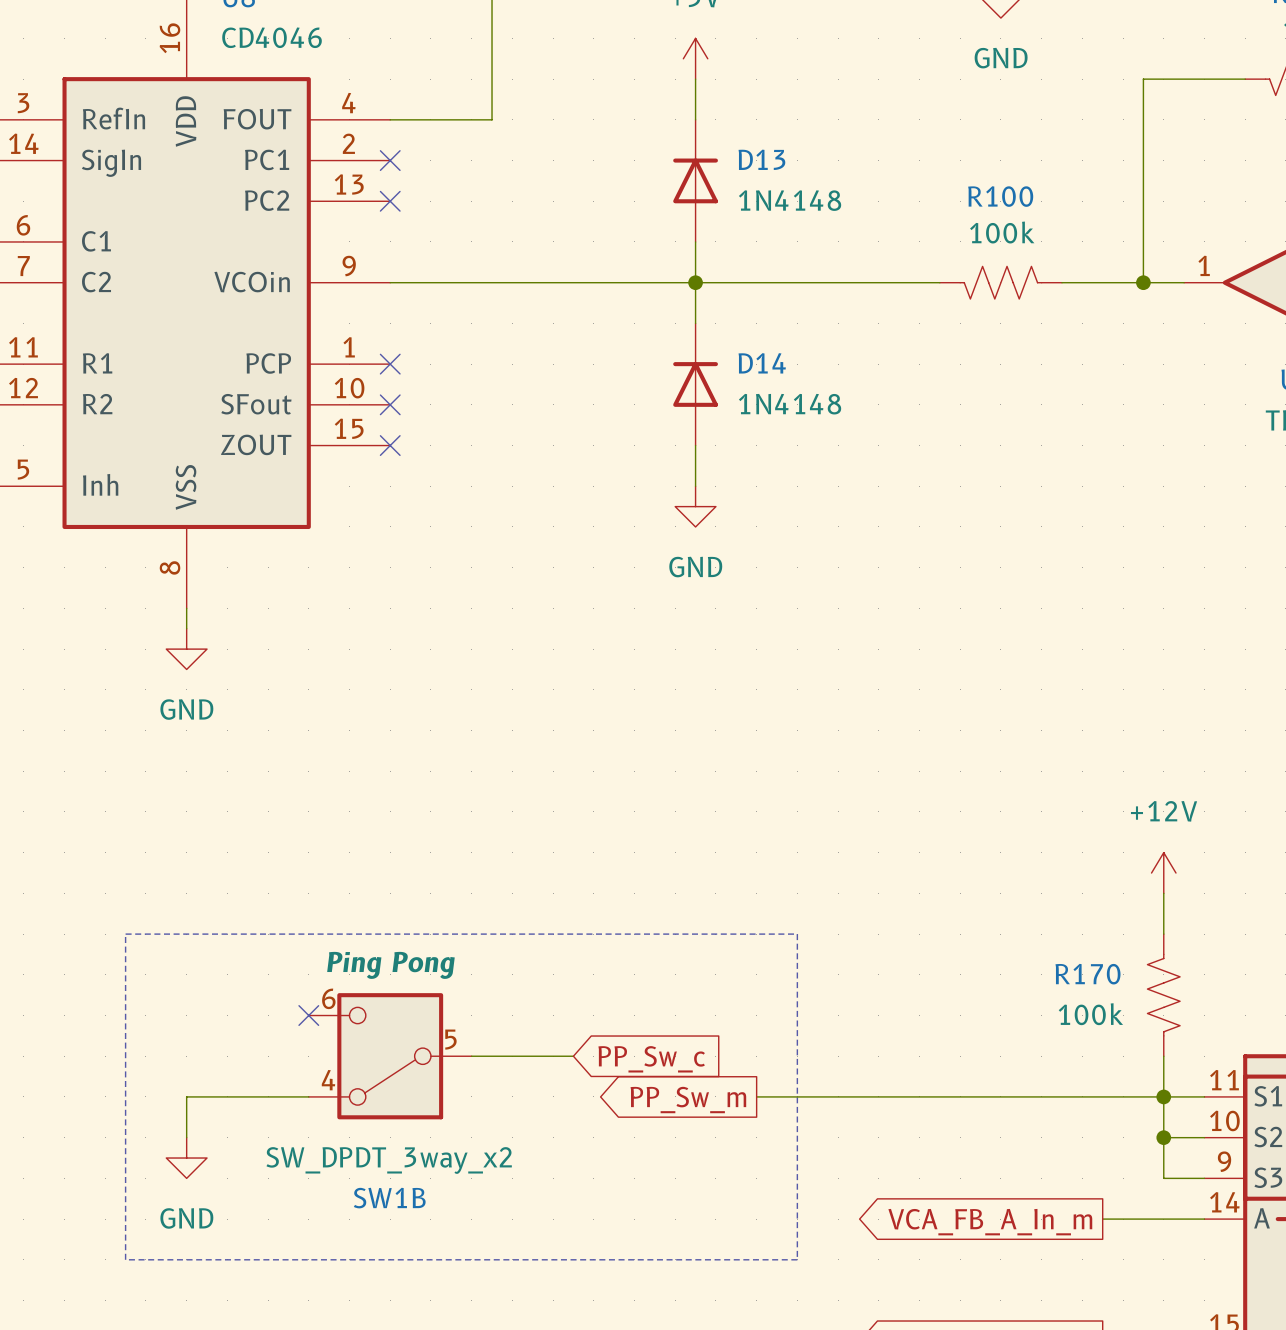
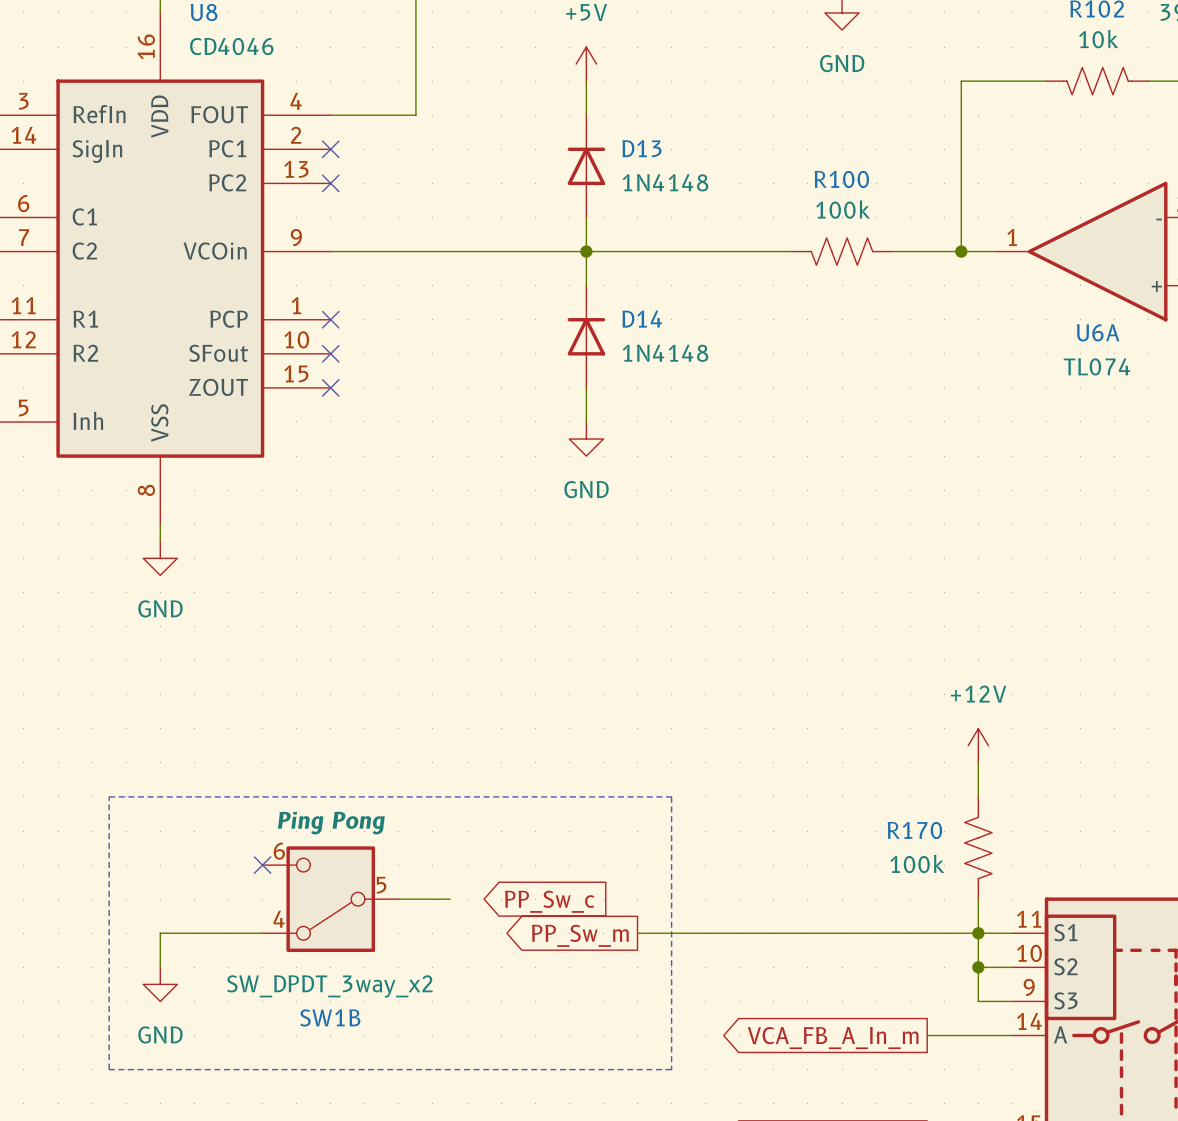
wire: (532, 1056) (573, 1056) -> none

